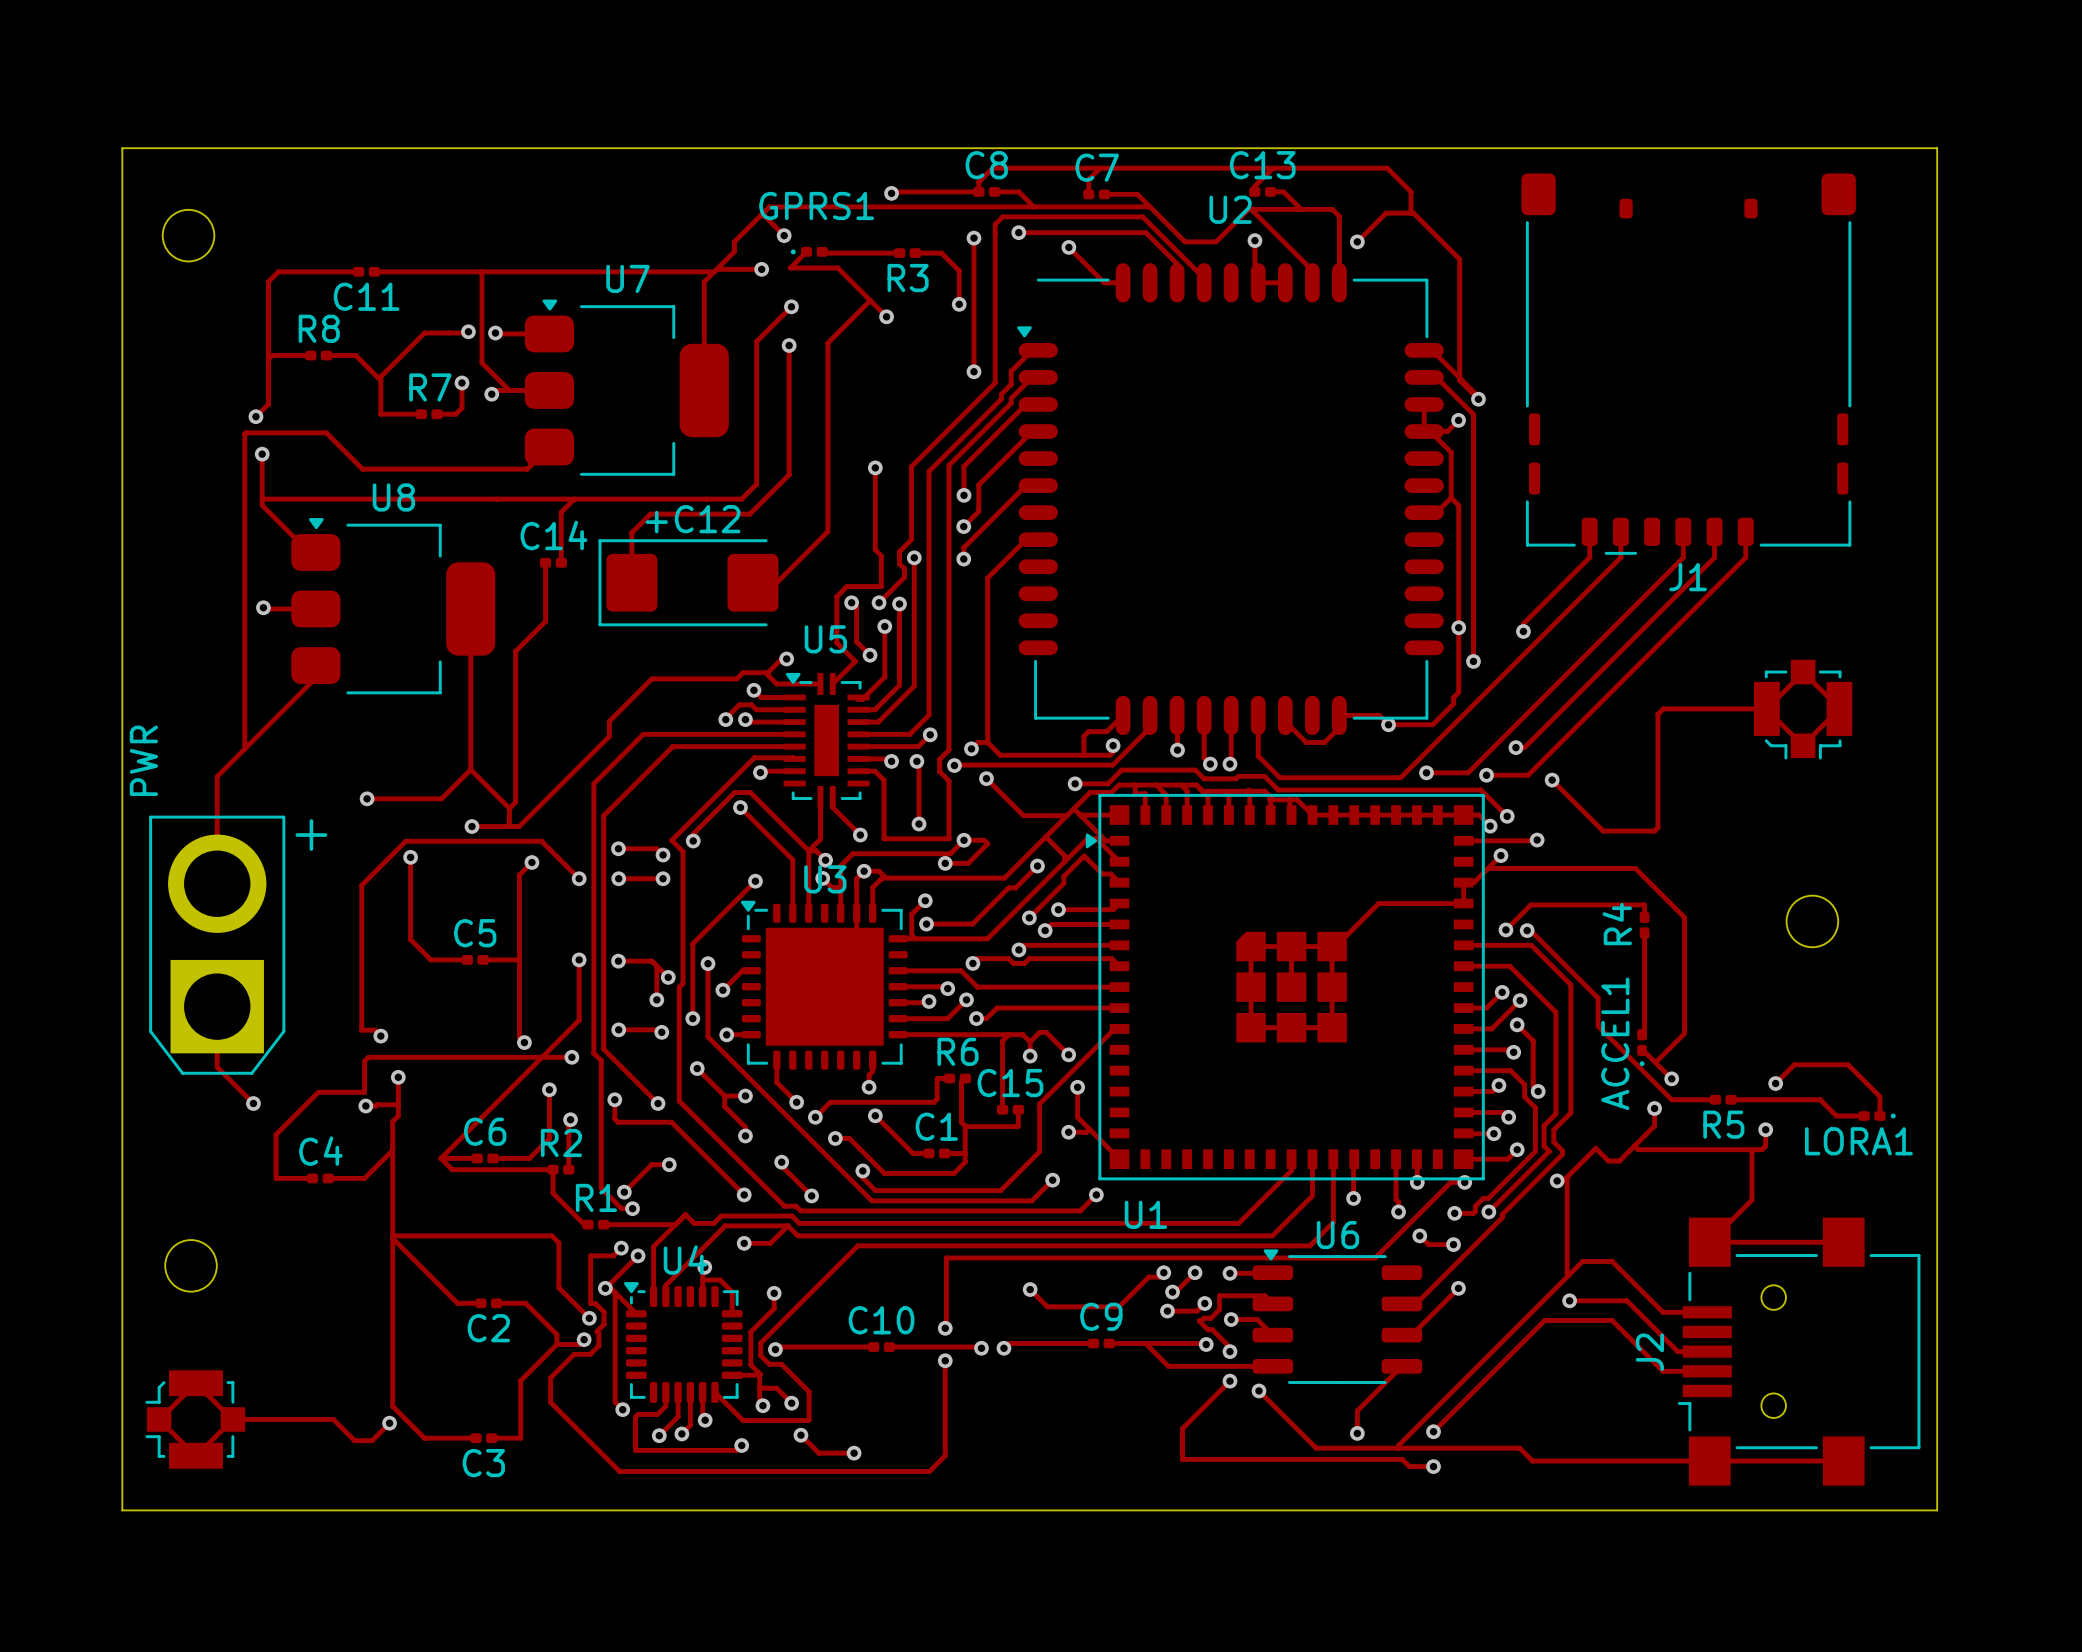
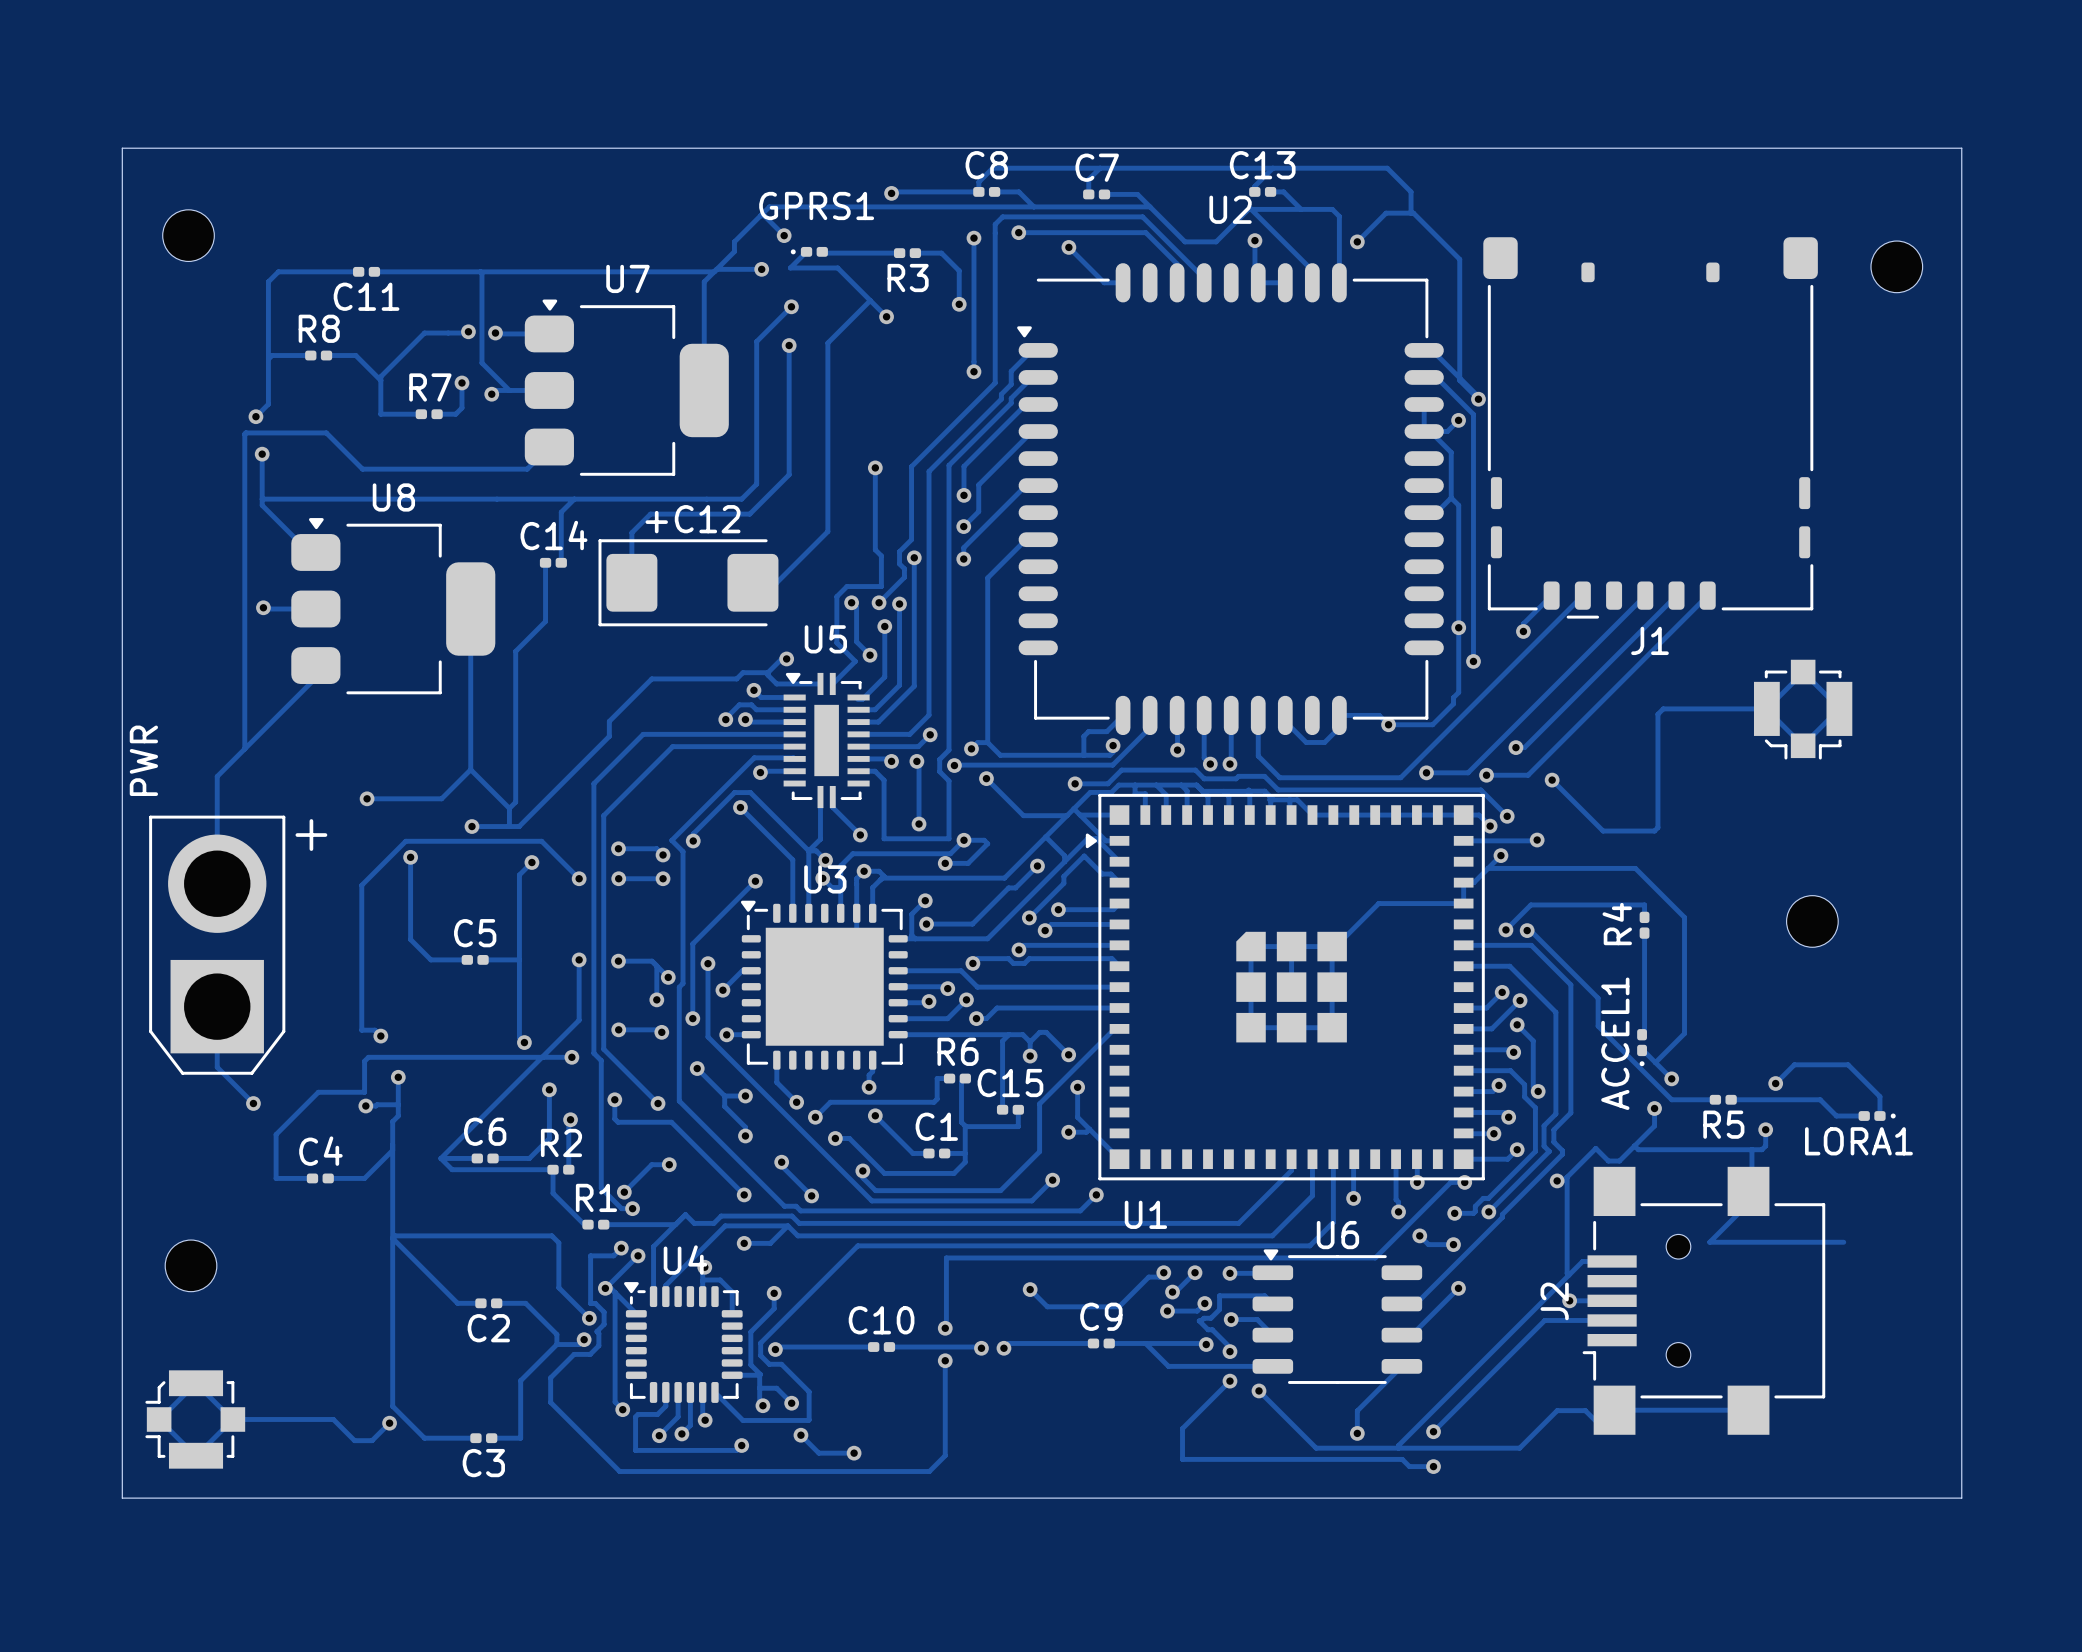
board edge: (1937, 148) (1937, 1510) (122, 1510) (122, 1498) -> (1937, 148) (1961, 148) (1961, 1498) (122, 1498)
part: none -> (1896, 266)
J1 position: (1688, 364) -> (1650, 427)
track: (1589, 531) (1589, 557) (1551, 595) -> none
track: (1620, 531) (1620, 557) (1582, 595) -> none
track: (1683, 531) (1683, 557) (1645, 595) -> none
track: (1714, 531) (1714, 557) (1676, 595) -> none
track: (1745, 531) (1745, 557) (1707, 595) -> none
track: (1612, 1261) (1662, 1312) (1707, 1312) -> none
track: (1612, 1300) (1626, 1300) (1677, 1351) (1707, 1351) -> none
track: (1612, 1320) (1662, 1371) (1707, 1371) -> none
J2 position: (1799, 1351) -> (1703, 1300)
track: (1519, 1448) (1532, 1461) (1843, 1461) -> (1519, 1448) (1557, 1410) (1585, 1410) (1596, 1421) (1608, 1410) (1758, 1410)

